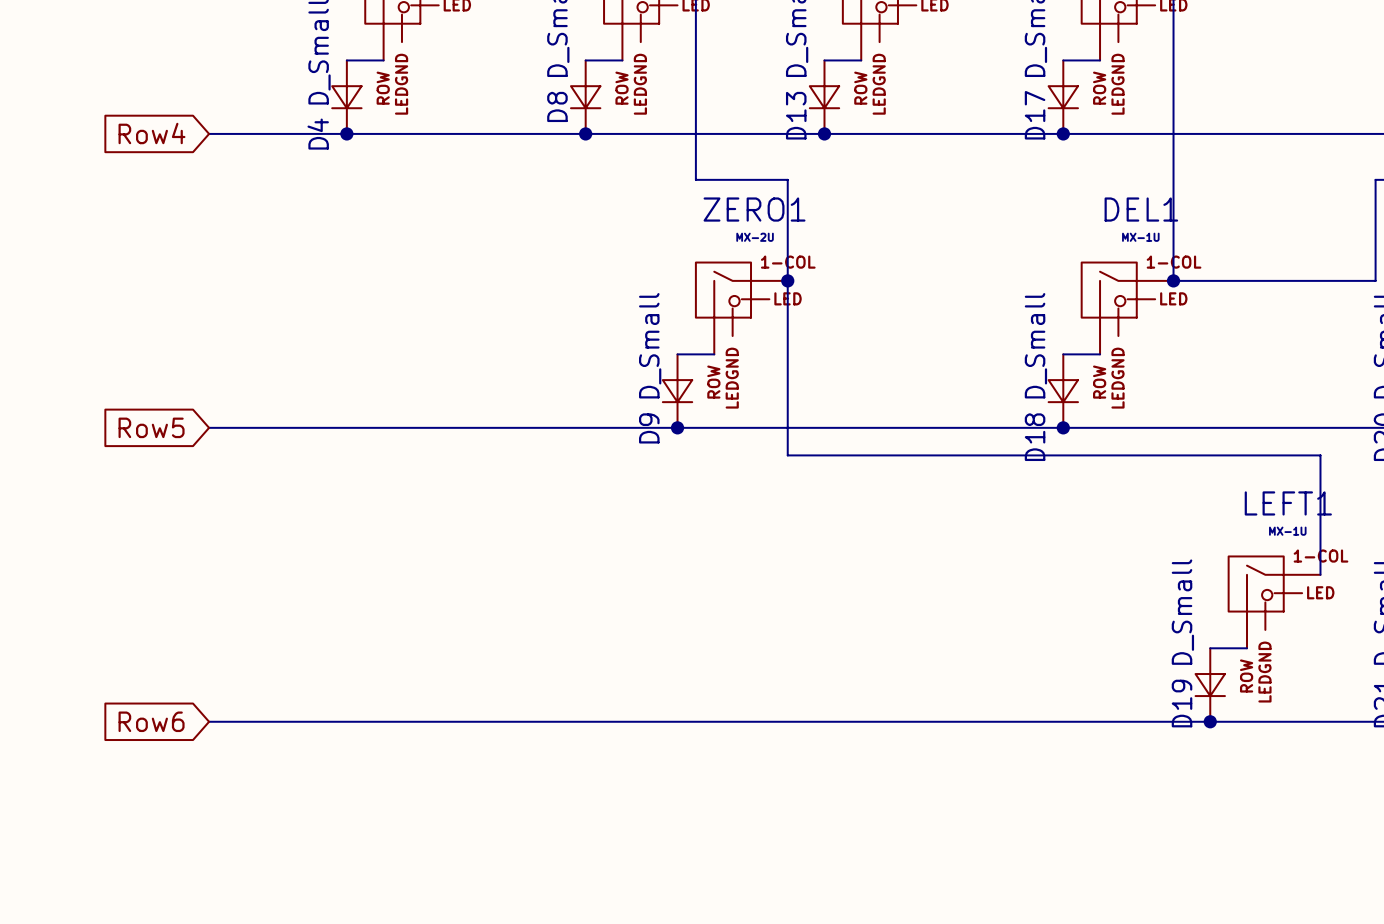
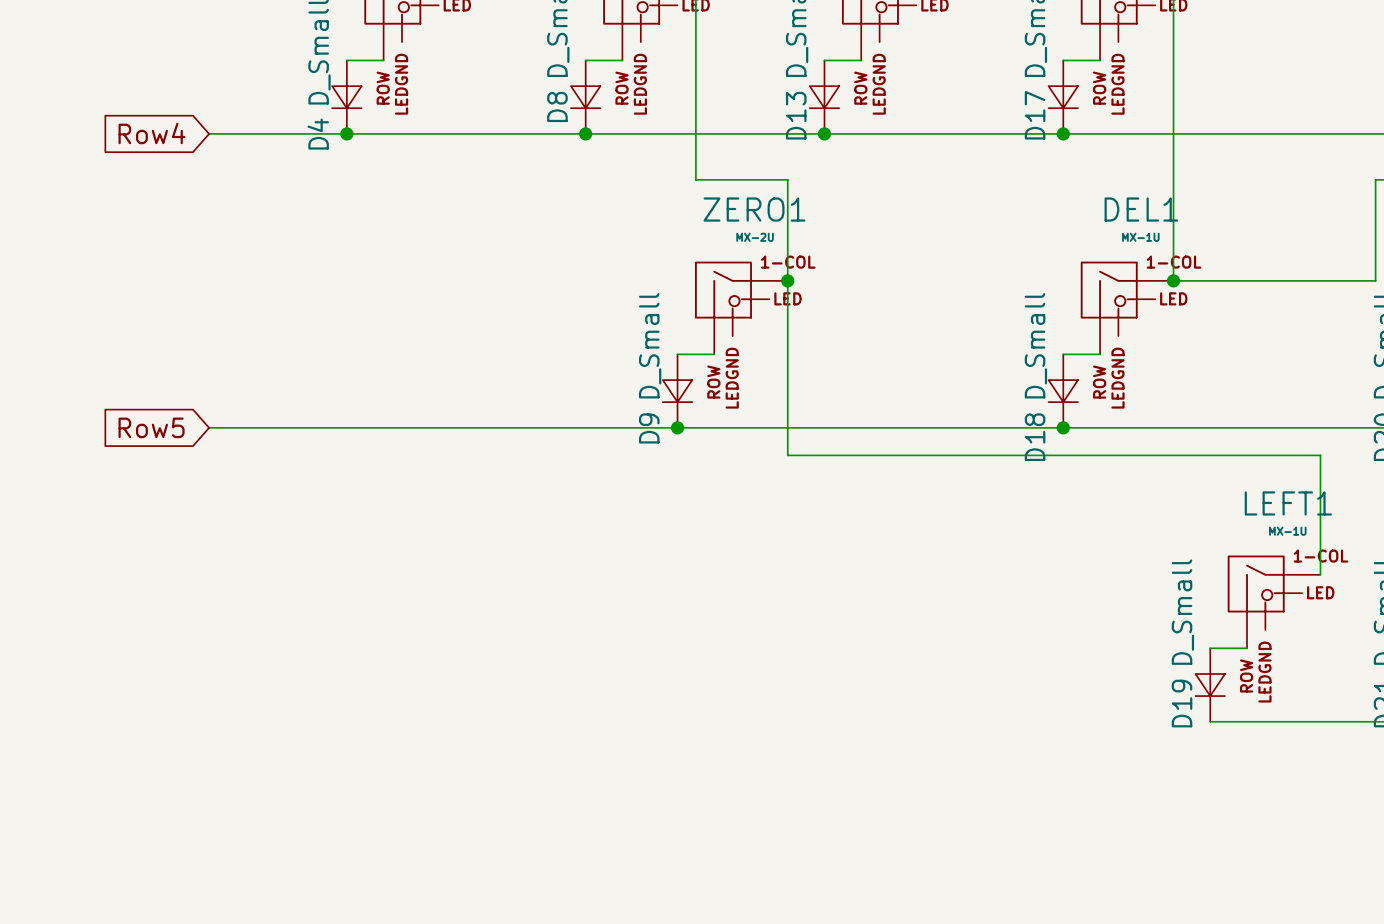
global label: Row6 (151, 721) -> none
wire: (209, 721) (1210, 721) -> none
junction: (1210, 721) -> none

